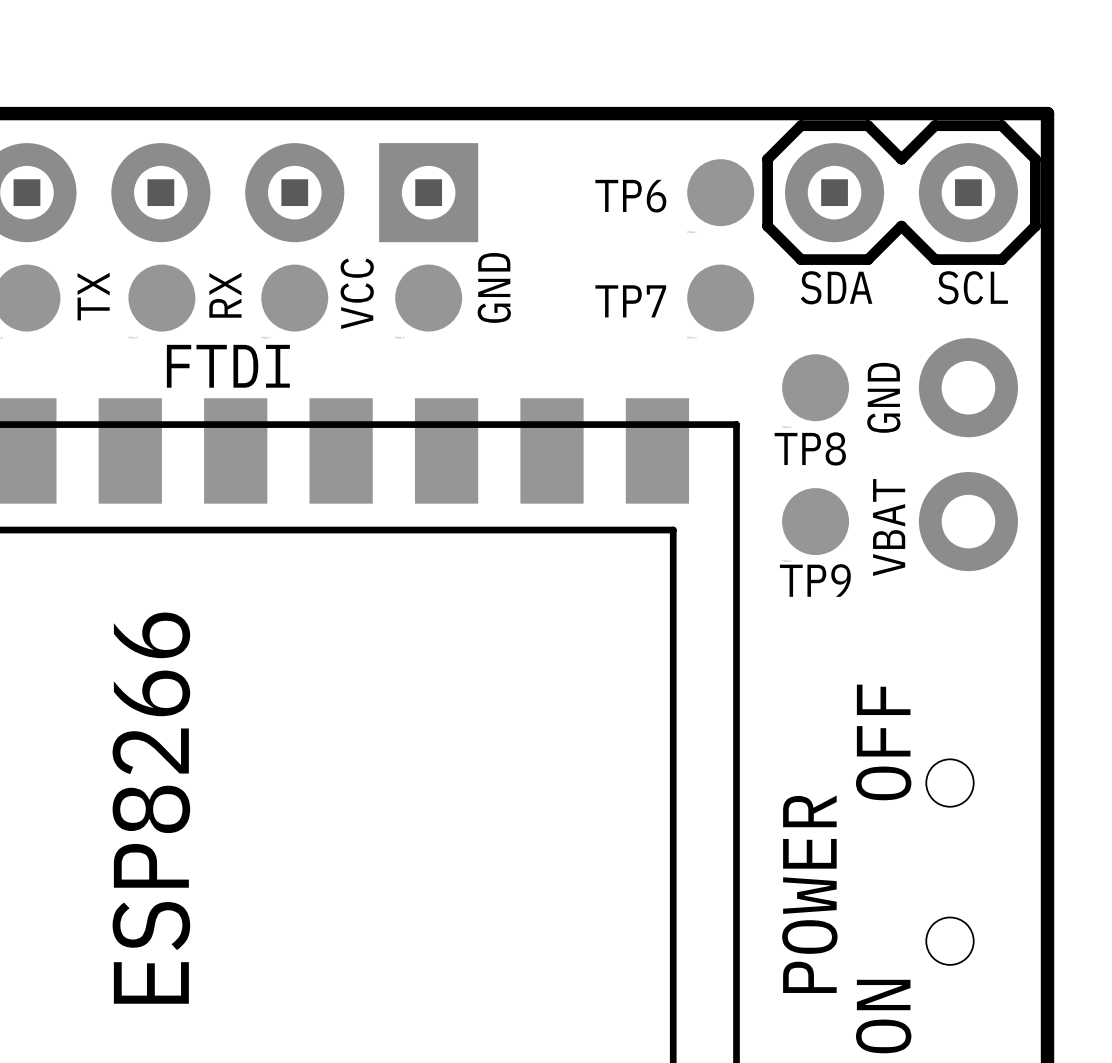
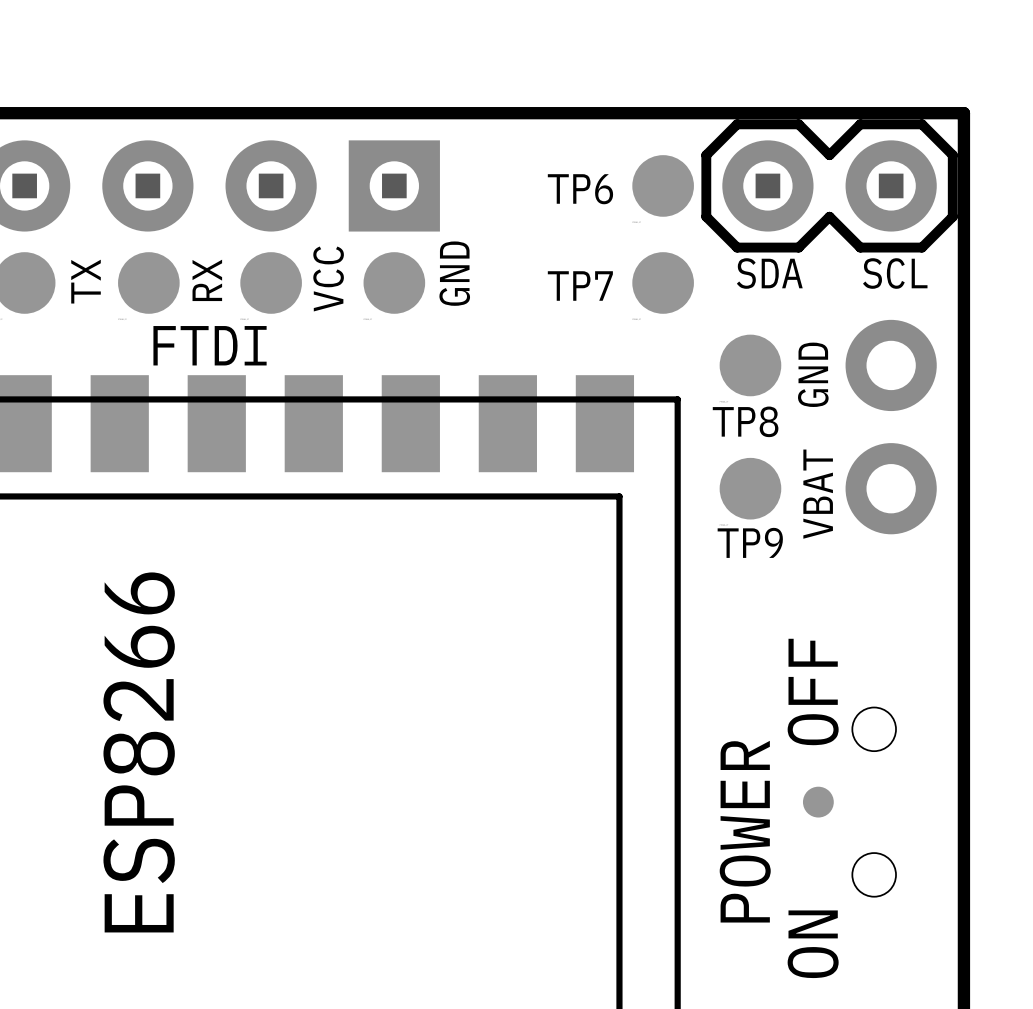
part: none -> (818, 802)

